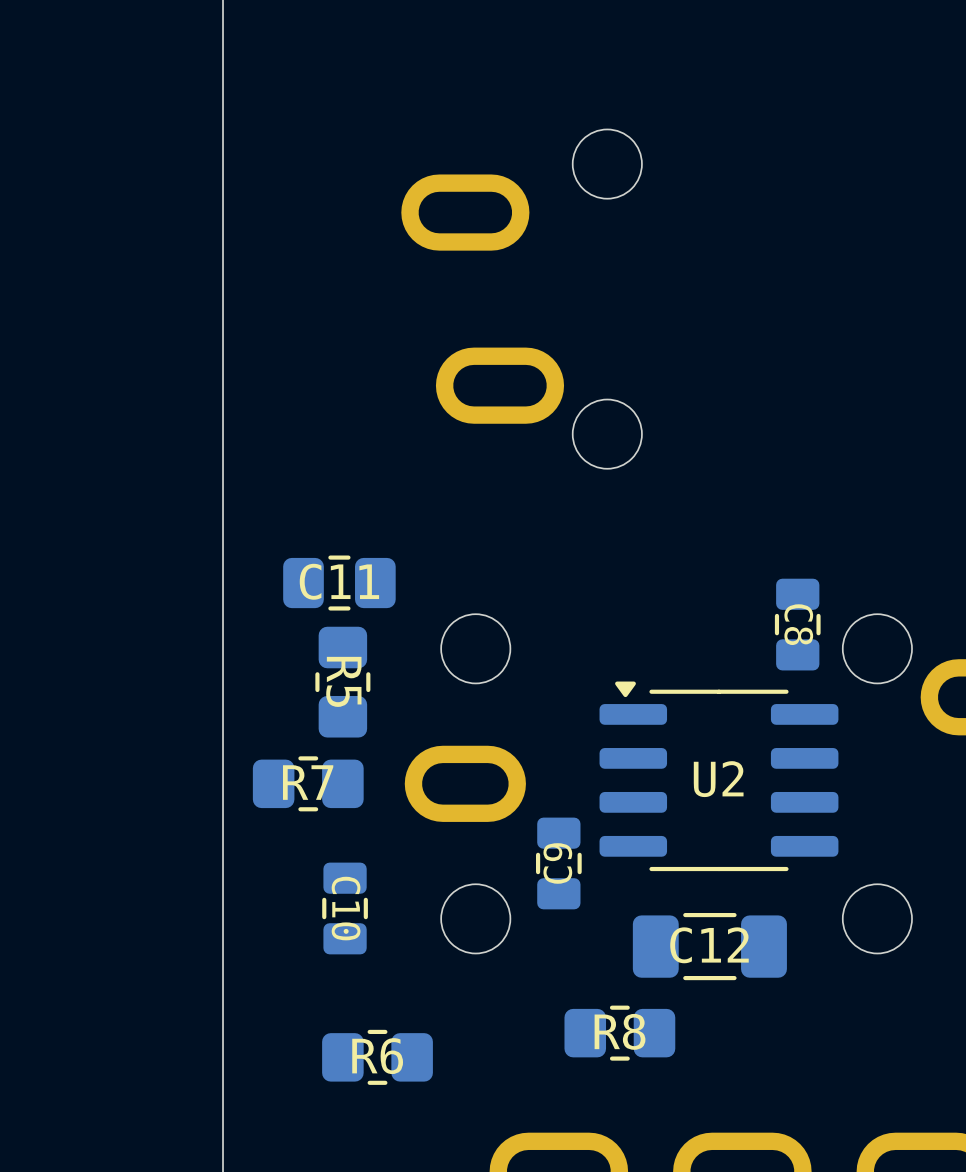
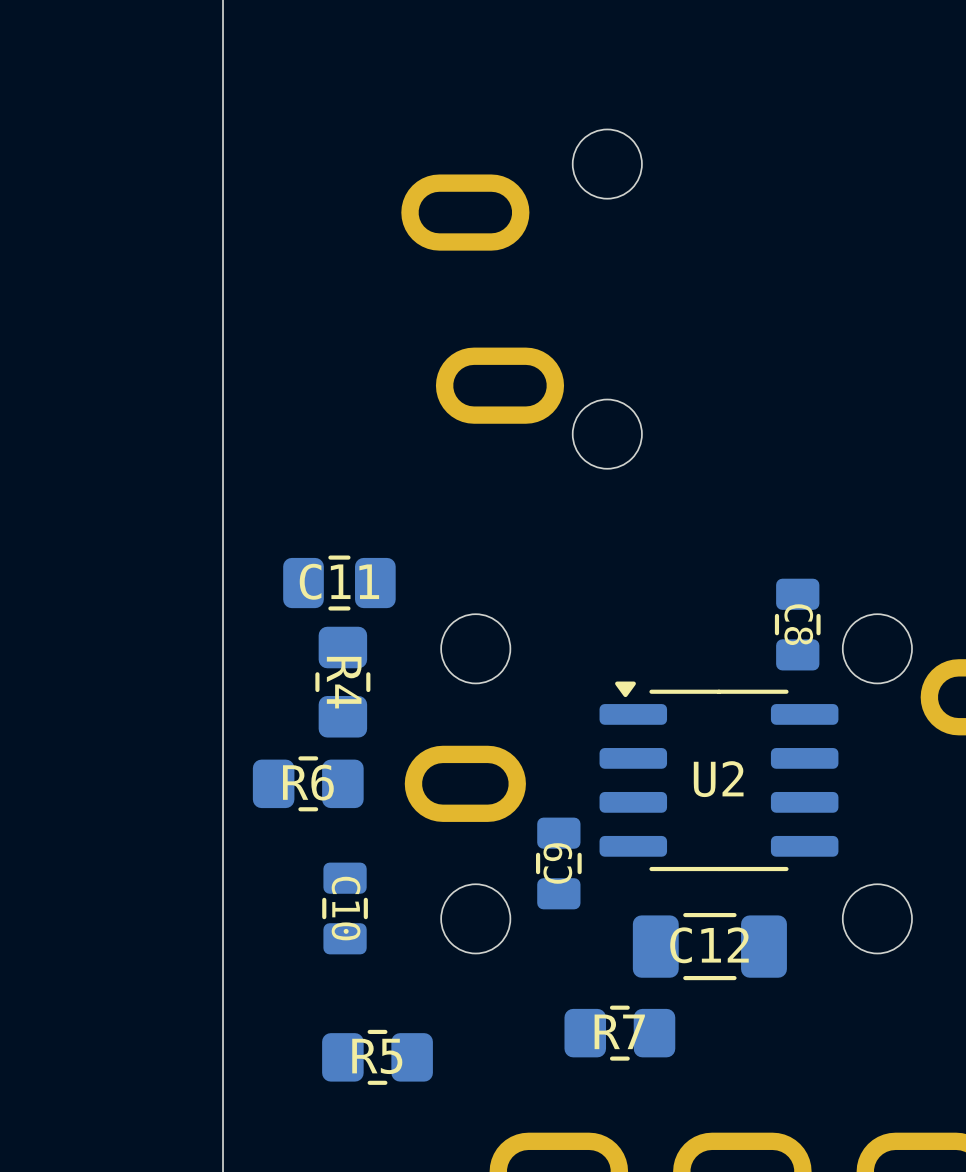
R5 name: R5 (343, 681) -> R4 (344, 682)
R7 name: R7 (308, 782) -> R6 (308, 782)
R8 name: R8 (620, 1031) -> R7 (619, 1031)
R6 name: R6 (377, 1056) -> R5 (377, 1056)

